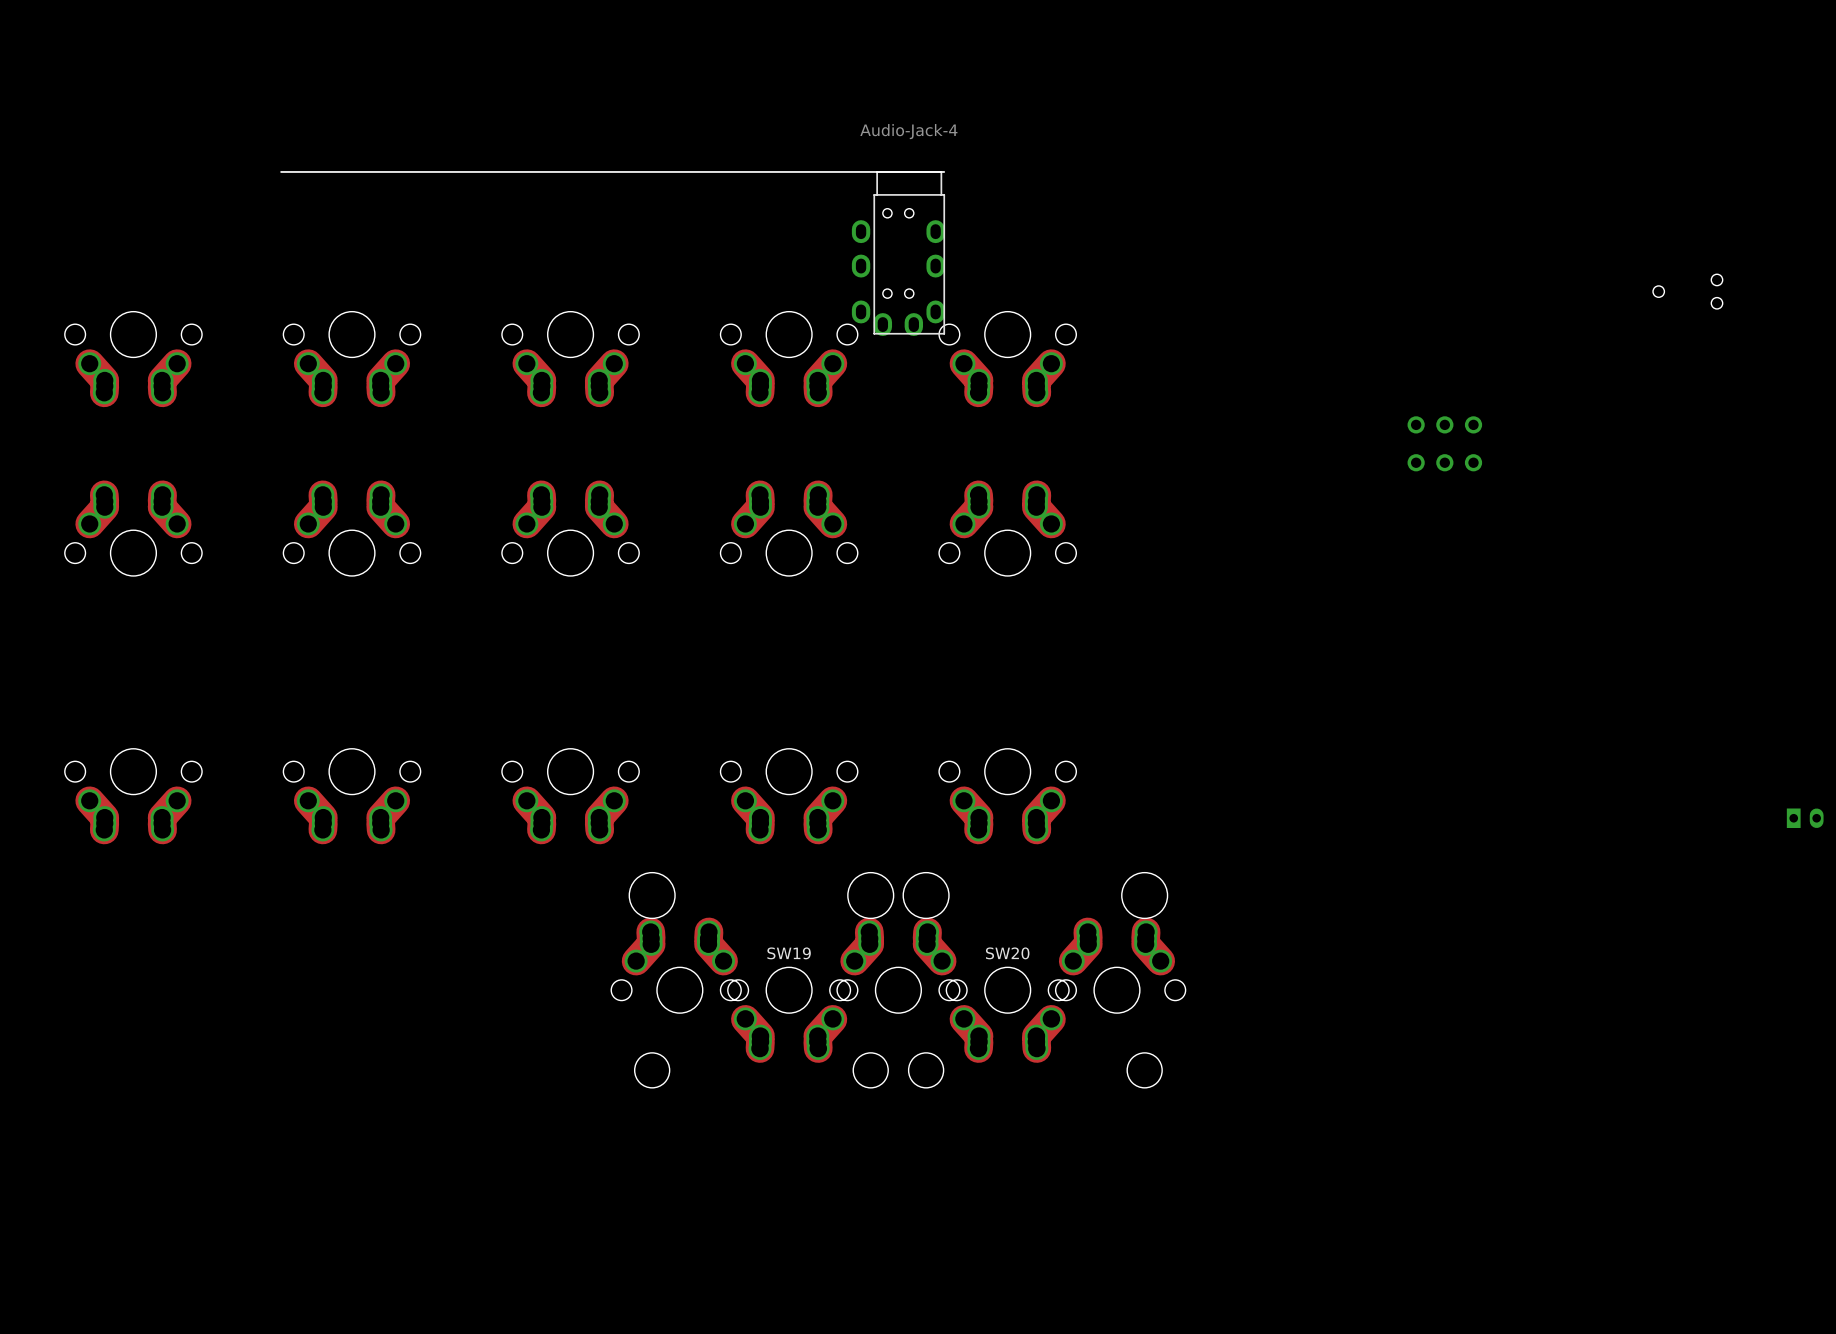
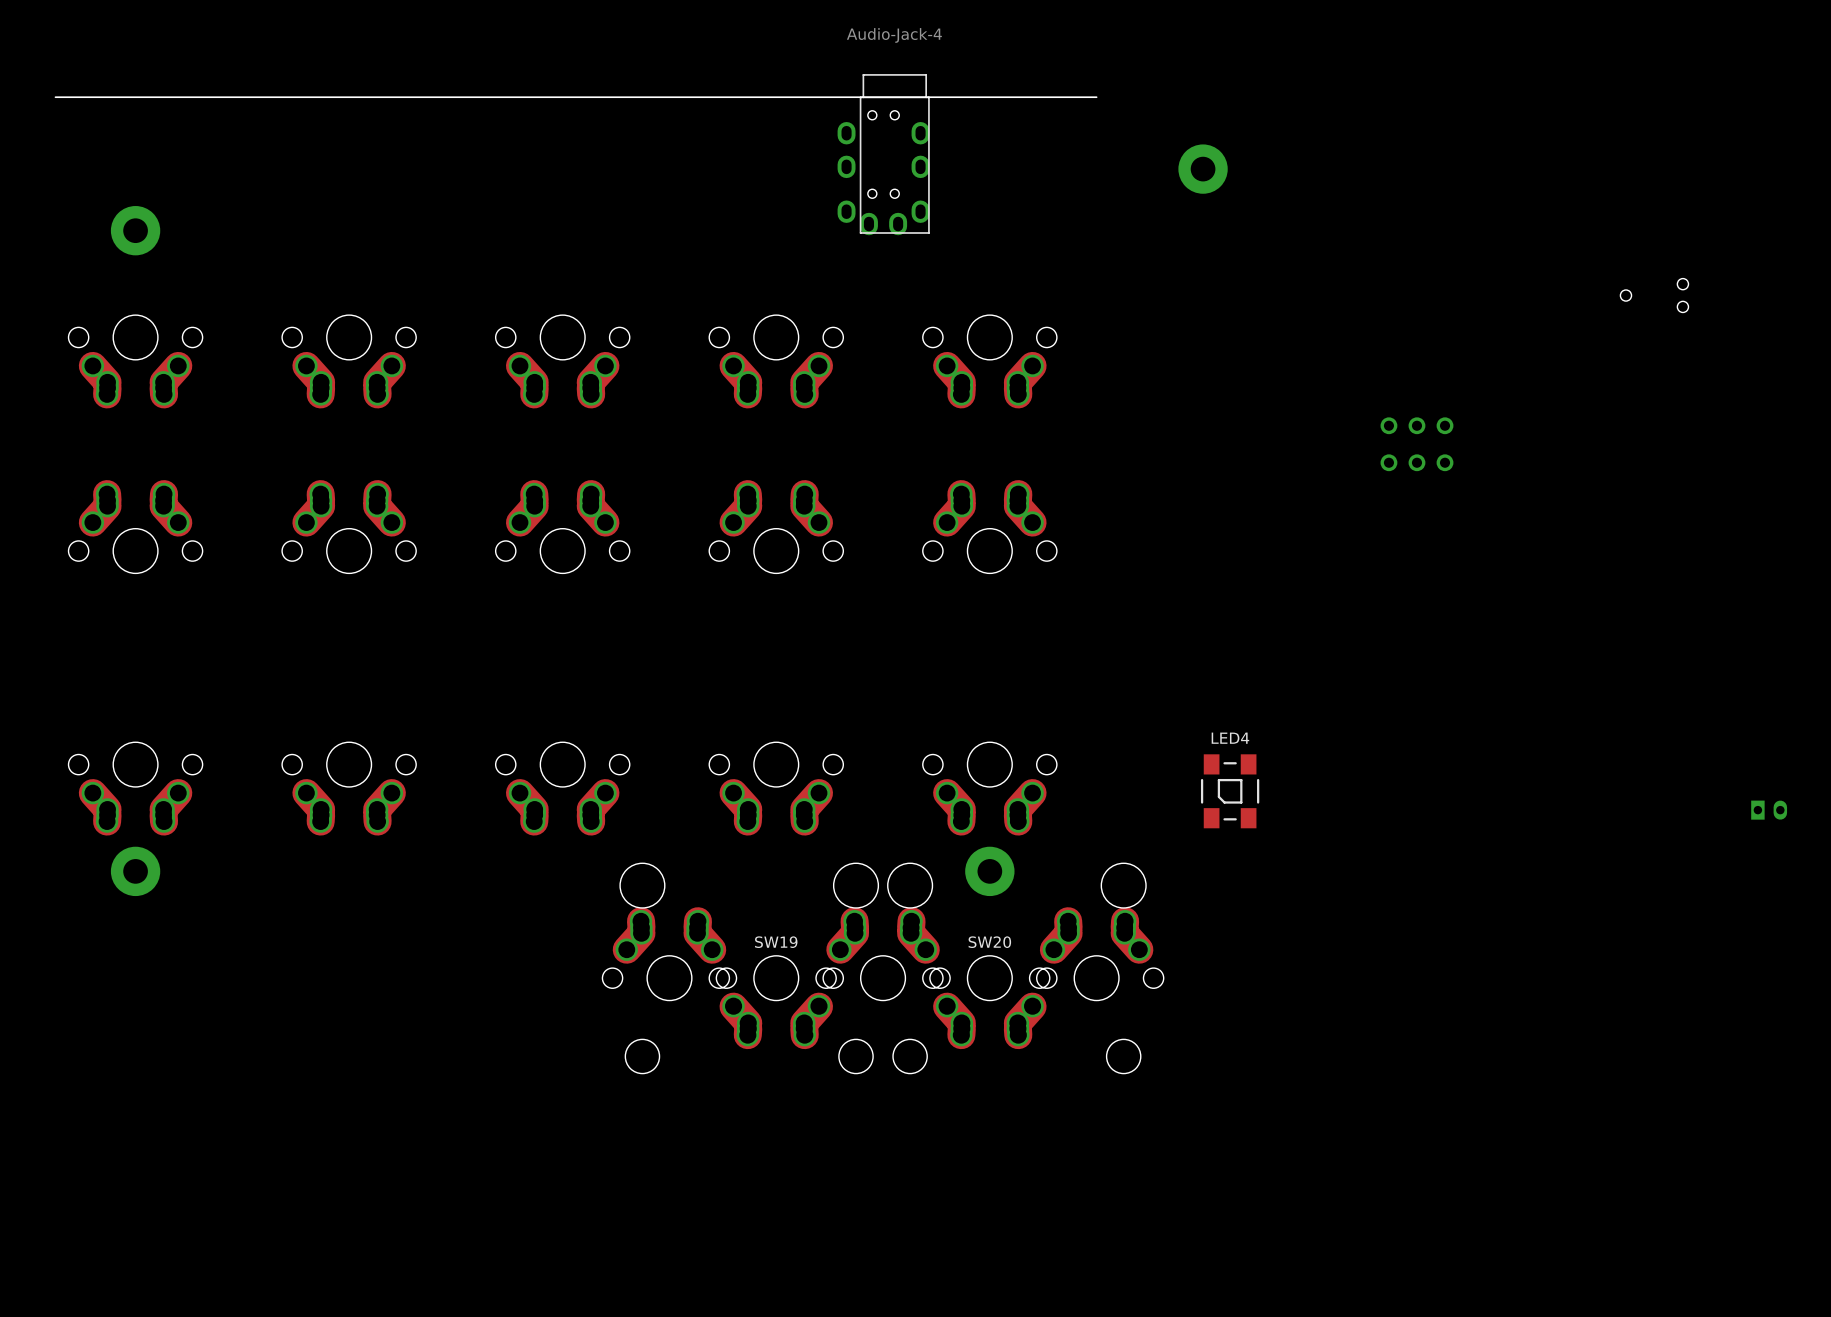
board edge: none -> (55, 97) (1096, 97)
part: none -> (1203, 169)
board edge: (281, 171) (944, 171) -> none
part: none -> (135, 230)
part position: (909, 253) -> (894, 154)
part position: (887, 272) -> (872, 173)
LED4: none -> (1230, 791)
part: none -> (135, 871)
part: none -> (989, 871)

